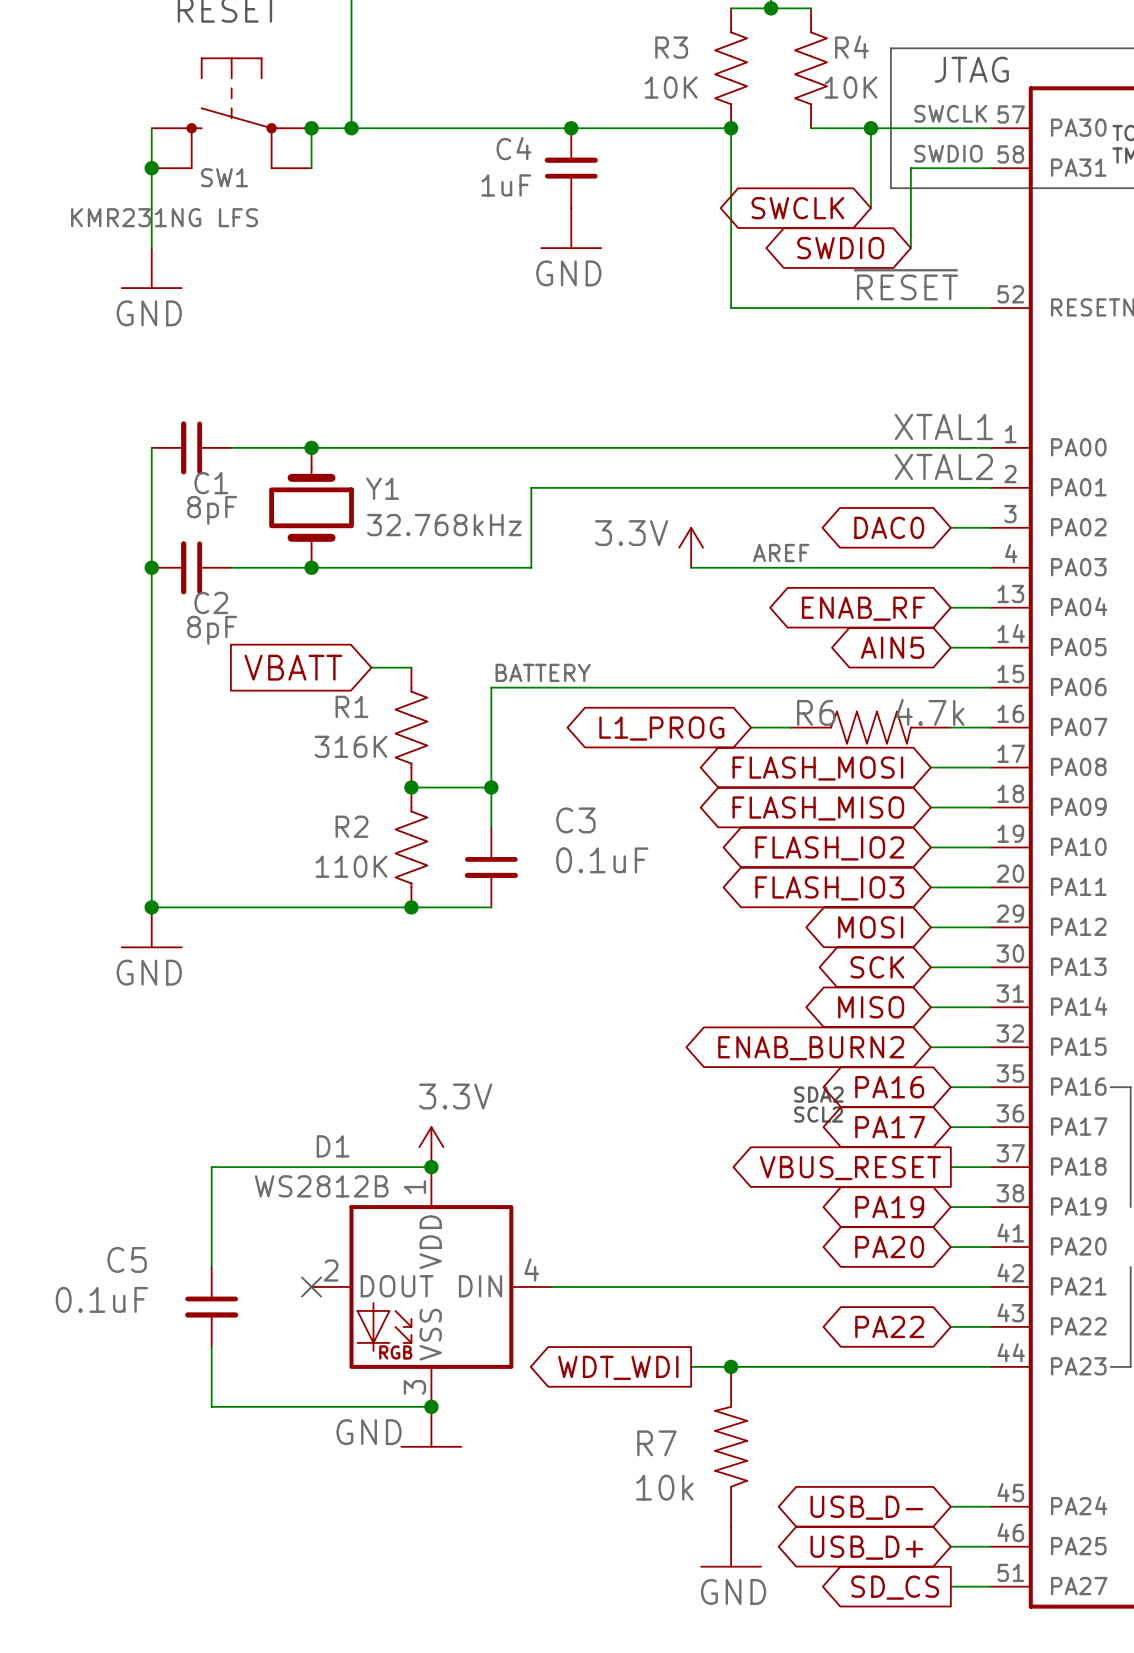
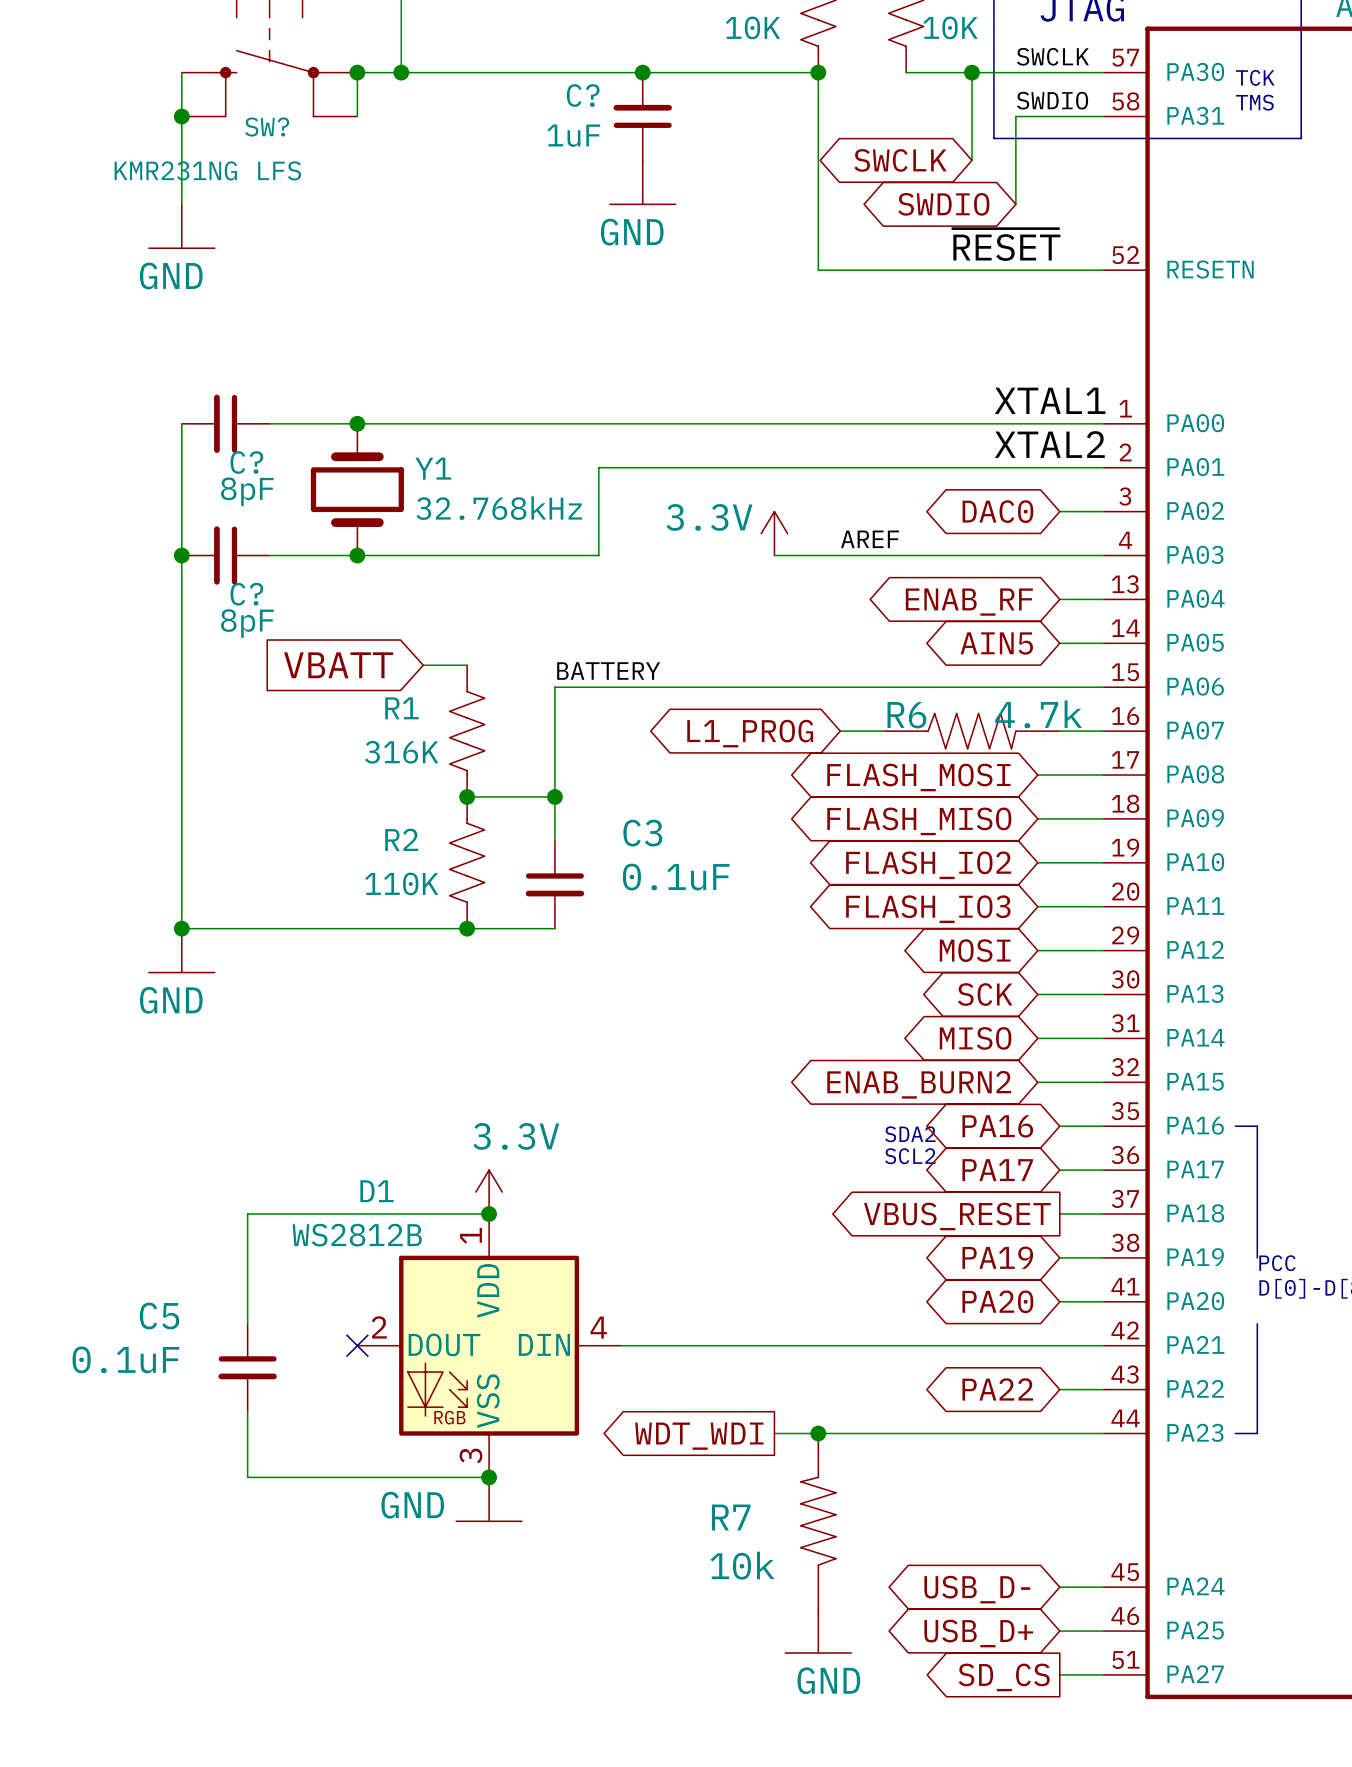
C4 name: C4 (513, 148) -> C? (583, 95)
SW1 name: SW1 (224, 177) -> SW? (267, 127)
C1 name: C1 (211, 483) -> C? (246, 462)
C2 name: C2 (211, 602) -> C? (246, 594)

